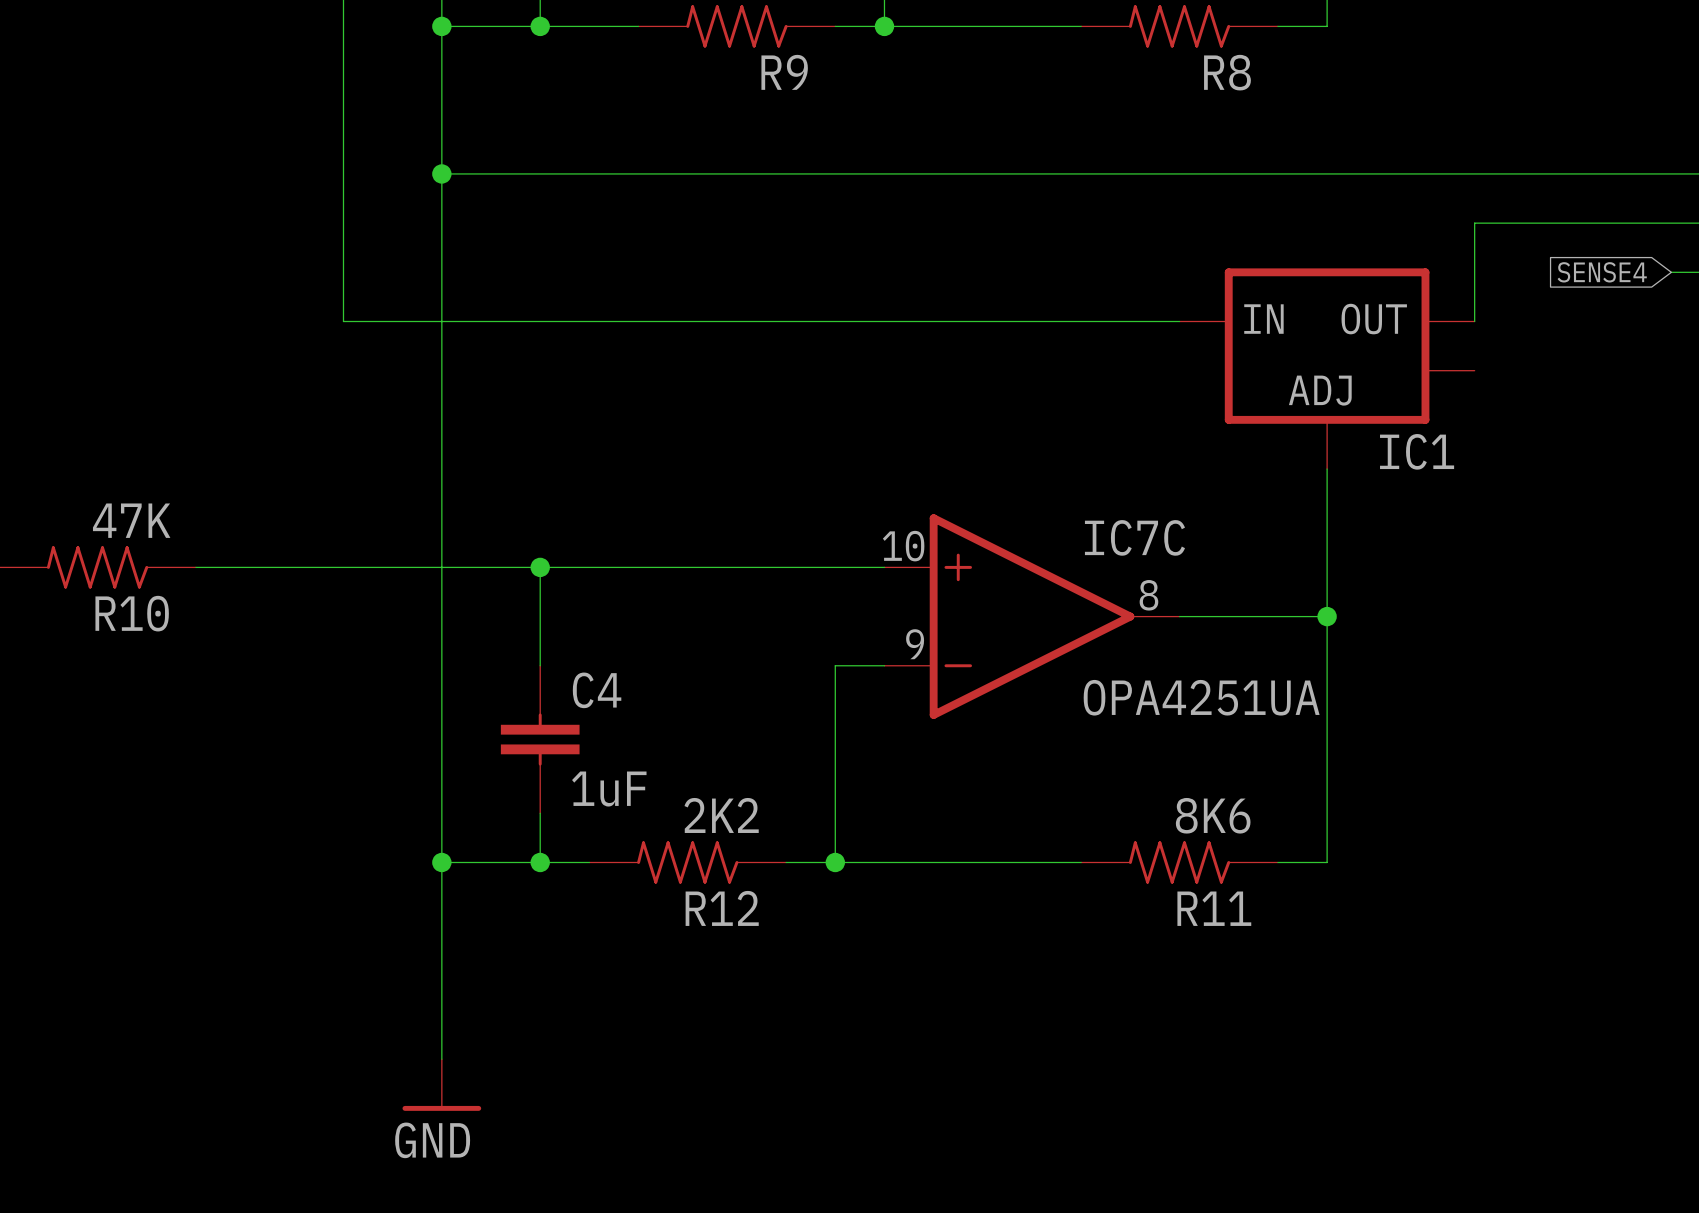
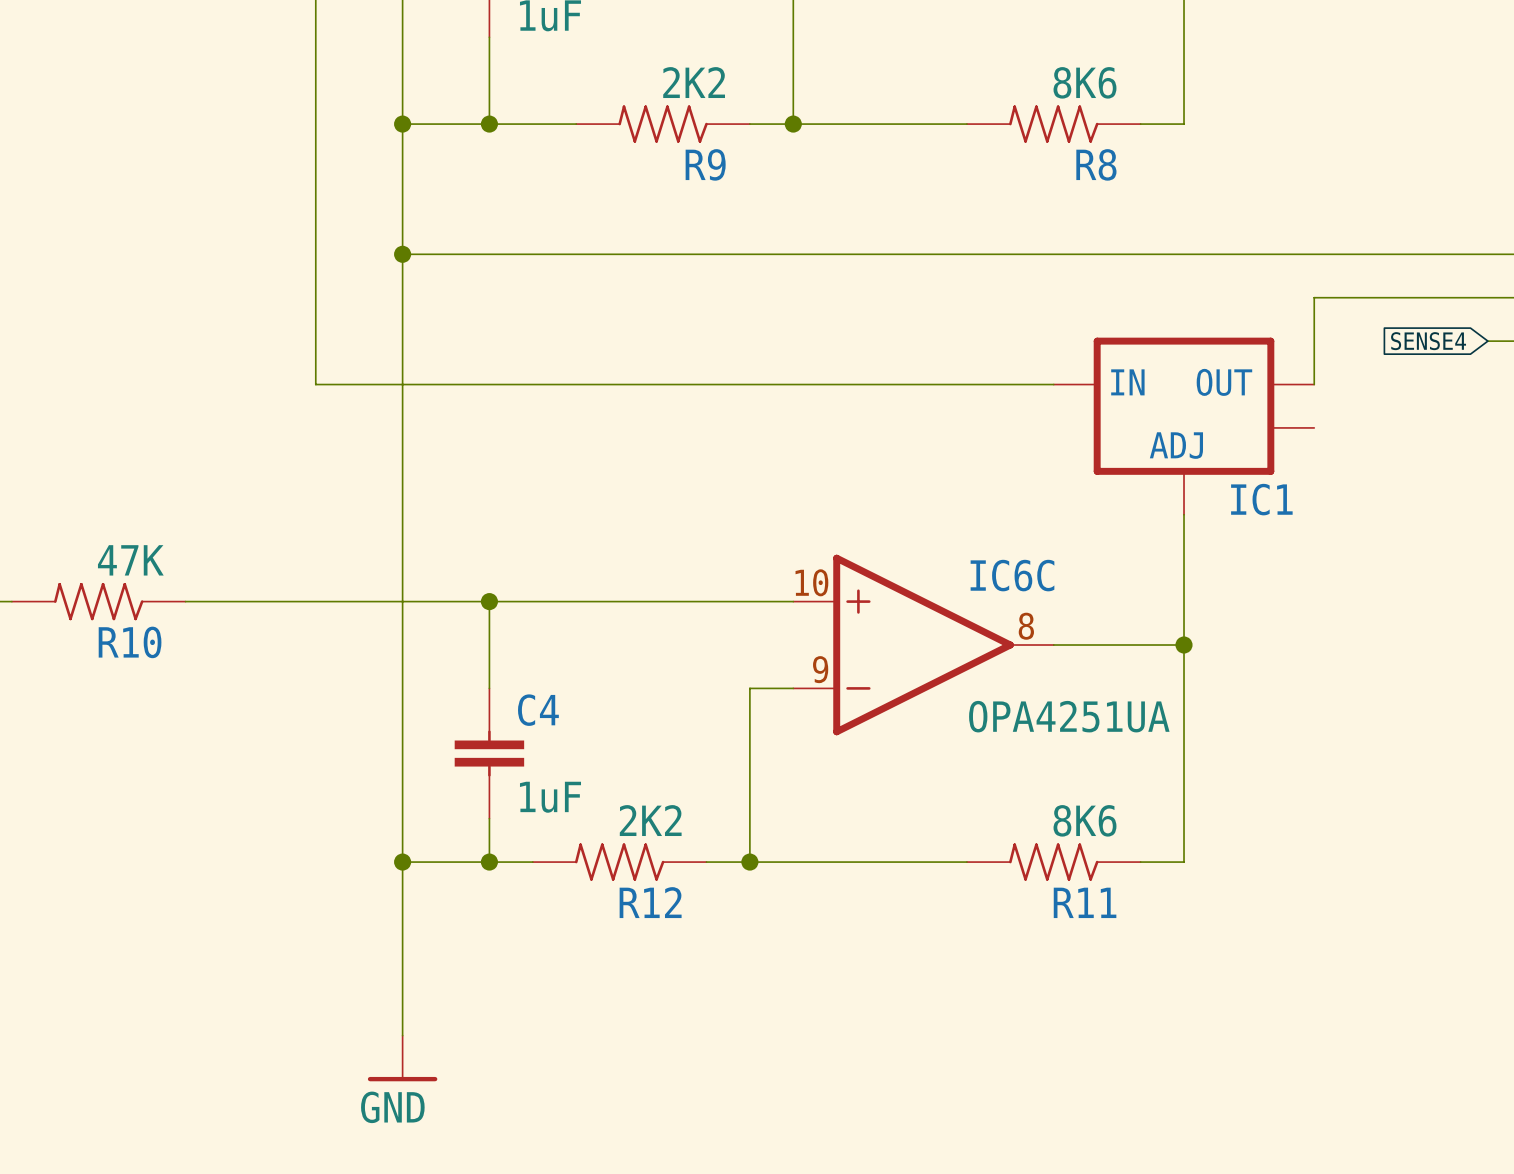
IC7C name: IC7C (1134, 537) -> IC6C (1012, 575)

